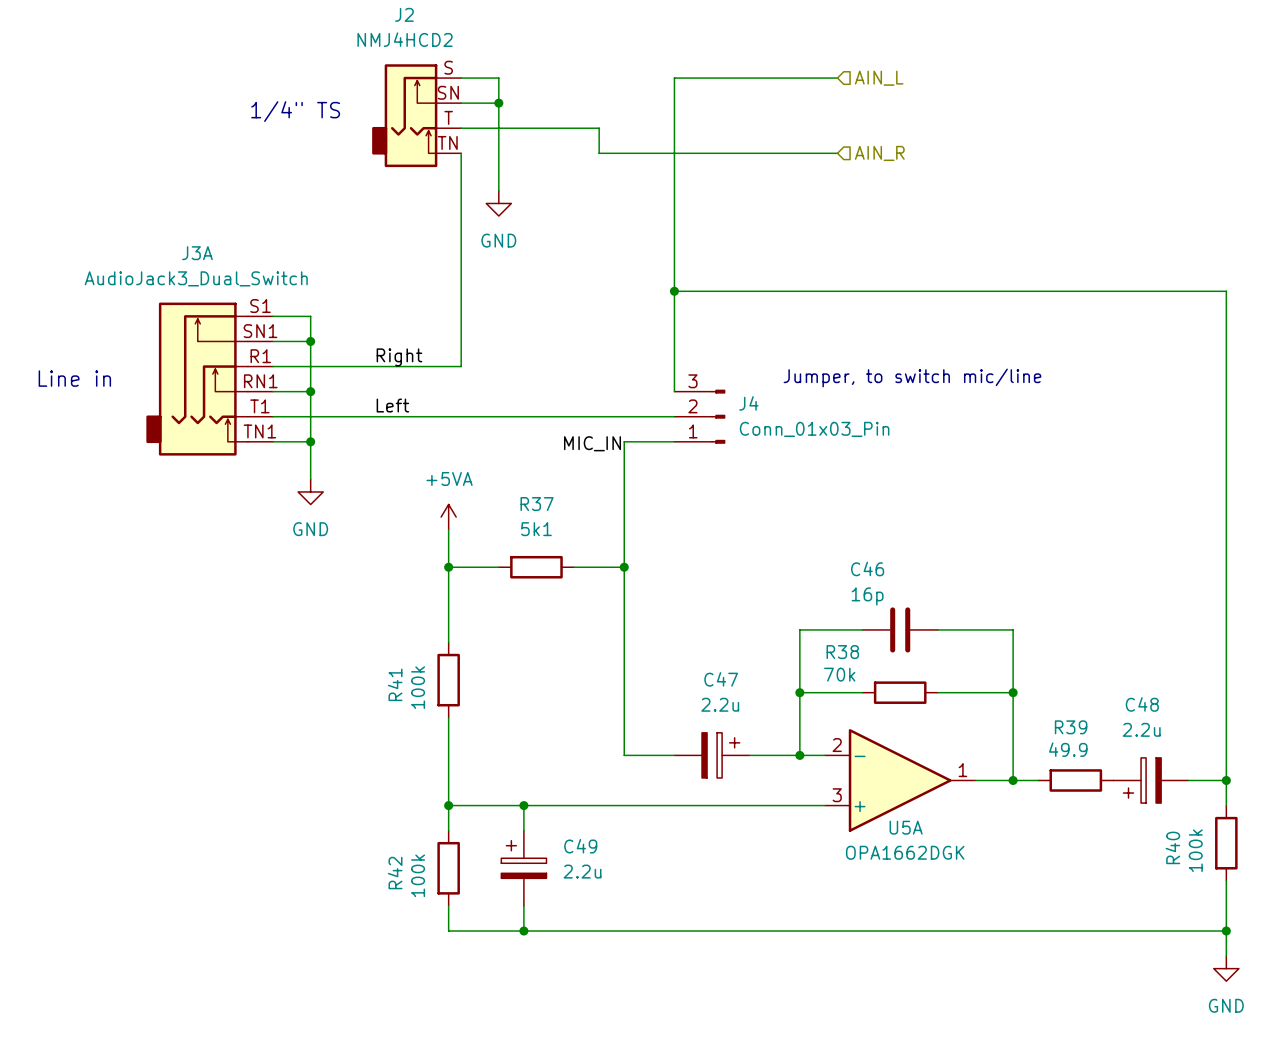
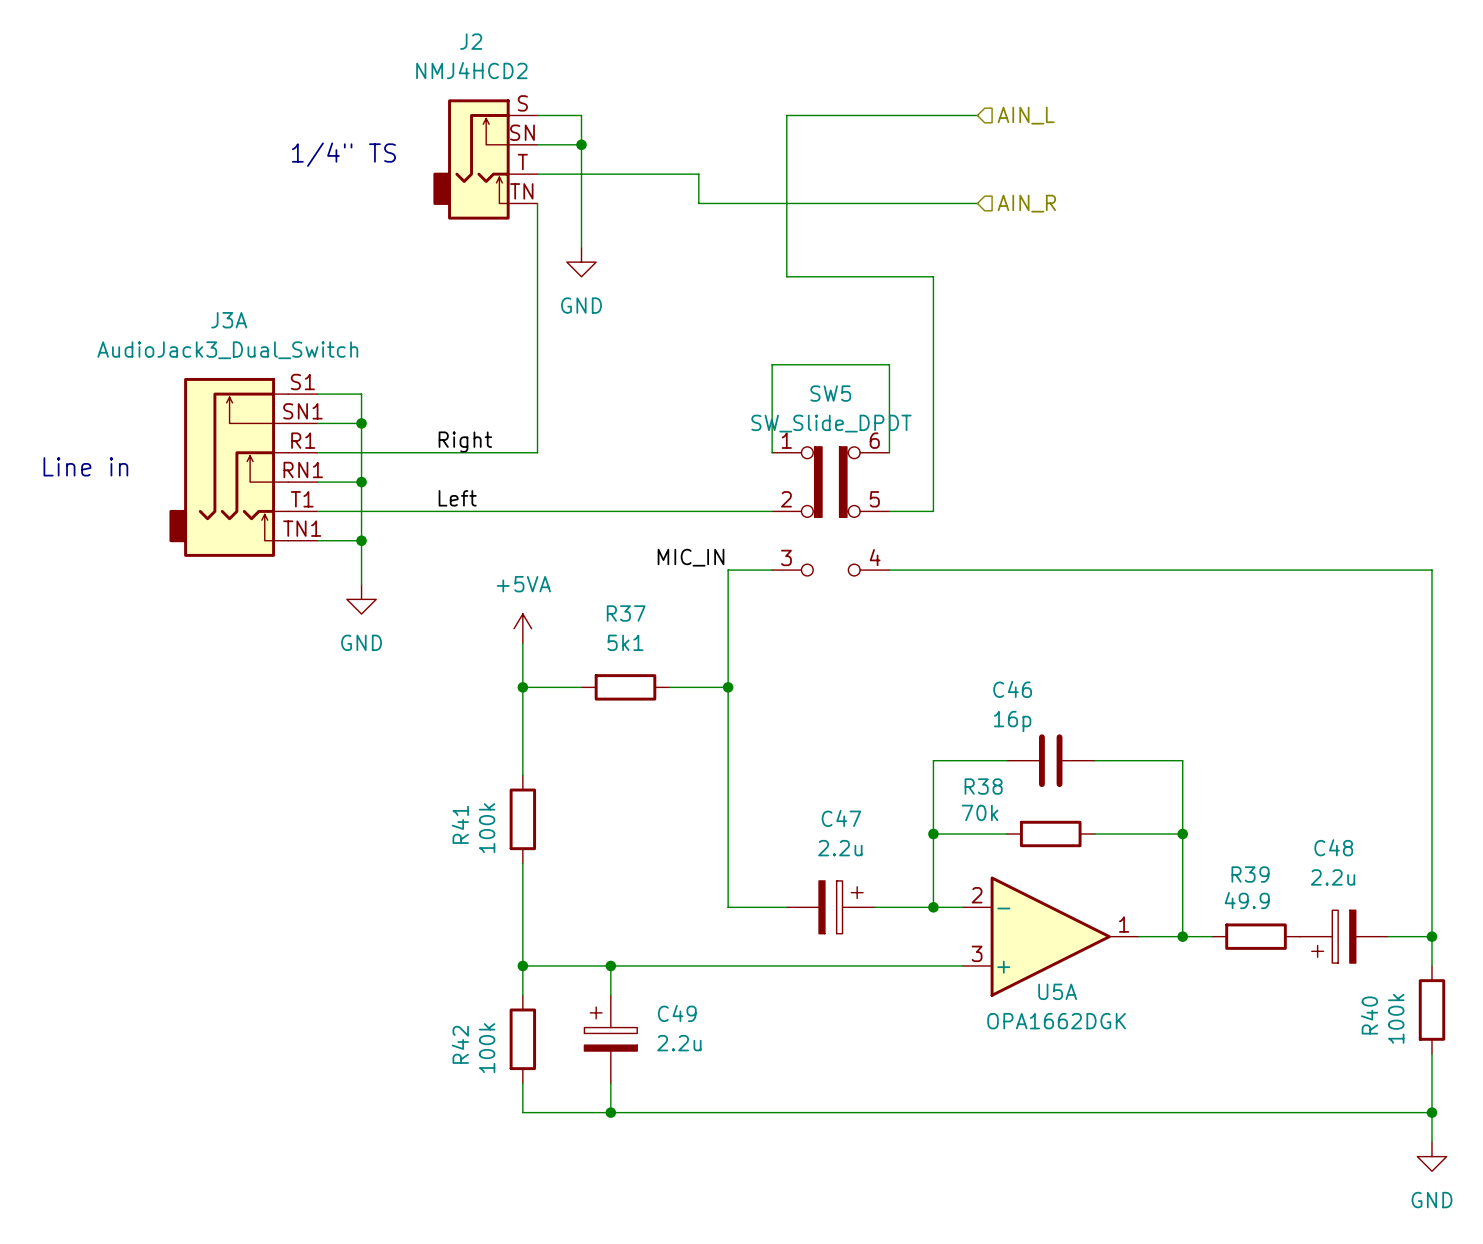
wire: (674, 216) (674, 391) -> (786, 276) (933, 276) (933, 511) (889, 511)
wire: none -> (786, 364) (772, 364) (772, 452)
junction: (674, 291) -> none
wire: (762, 291) (1226, 291) (1226, 466) -> (889, 570) (1432, 570)
wire: none -> (889, 364) (889, 452)
text: Jumper, to switch mic/line (912, 377) -> none
J4: Conn_01x03_Pin (699, 416) -> none
SW5: none -> SW_Slide_DPDT (830, 511)
wire: (674, 441) (624, 441) (624, 466) -> (772, 570) (728, 570)
label position: MIC_IN (592, 443) -> MIC_IN (691, 557)

